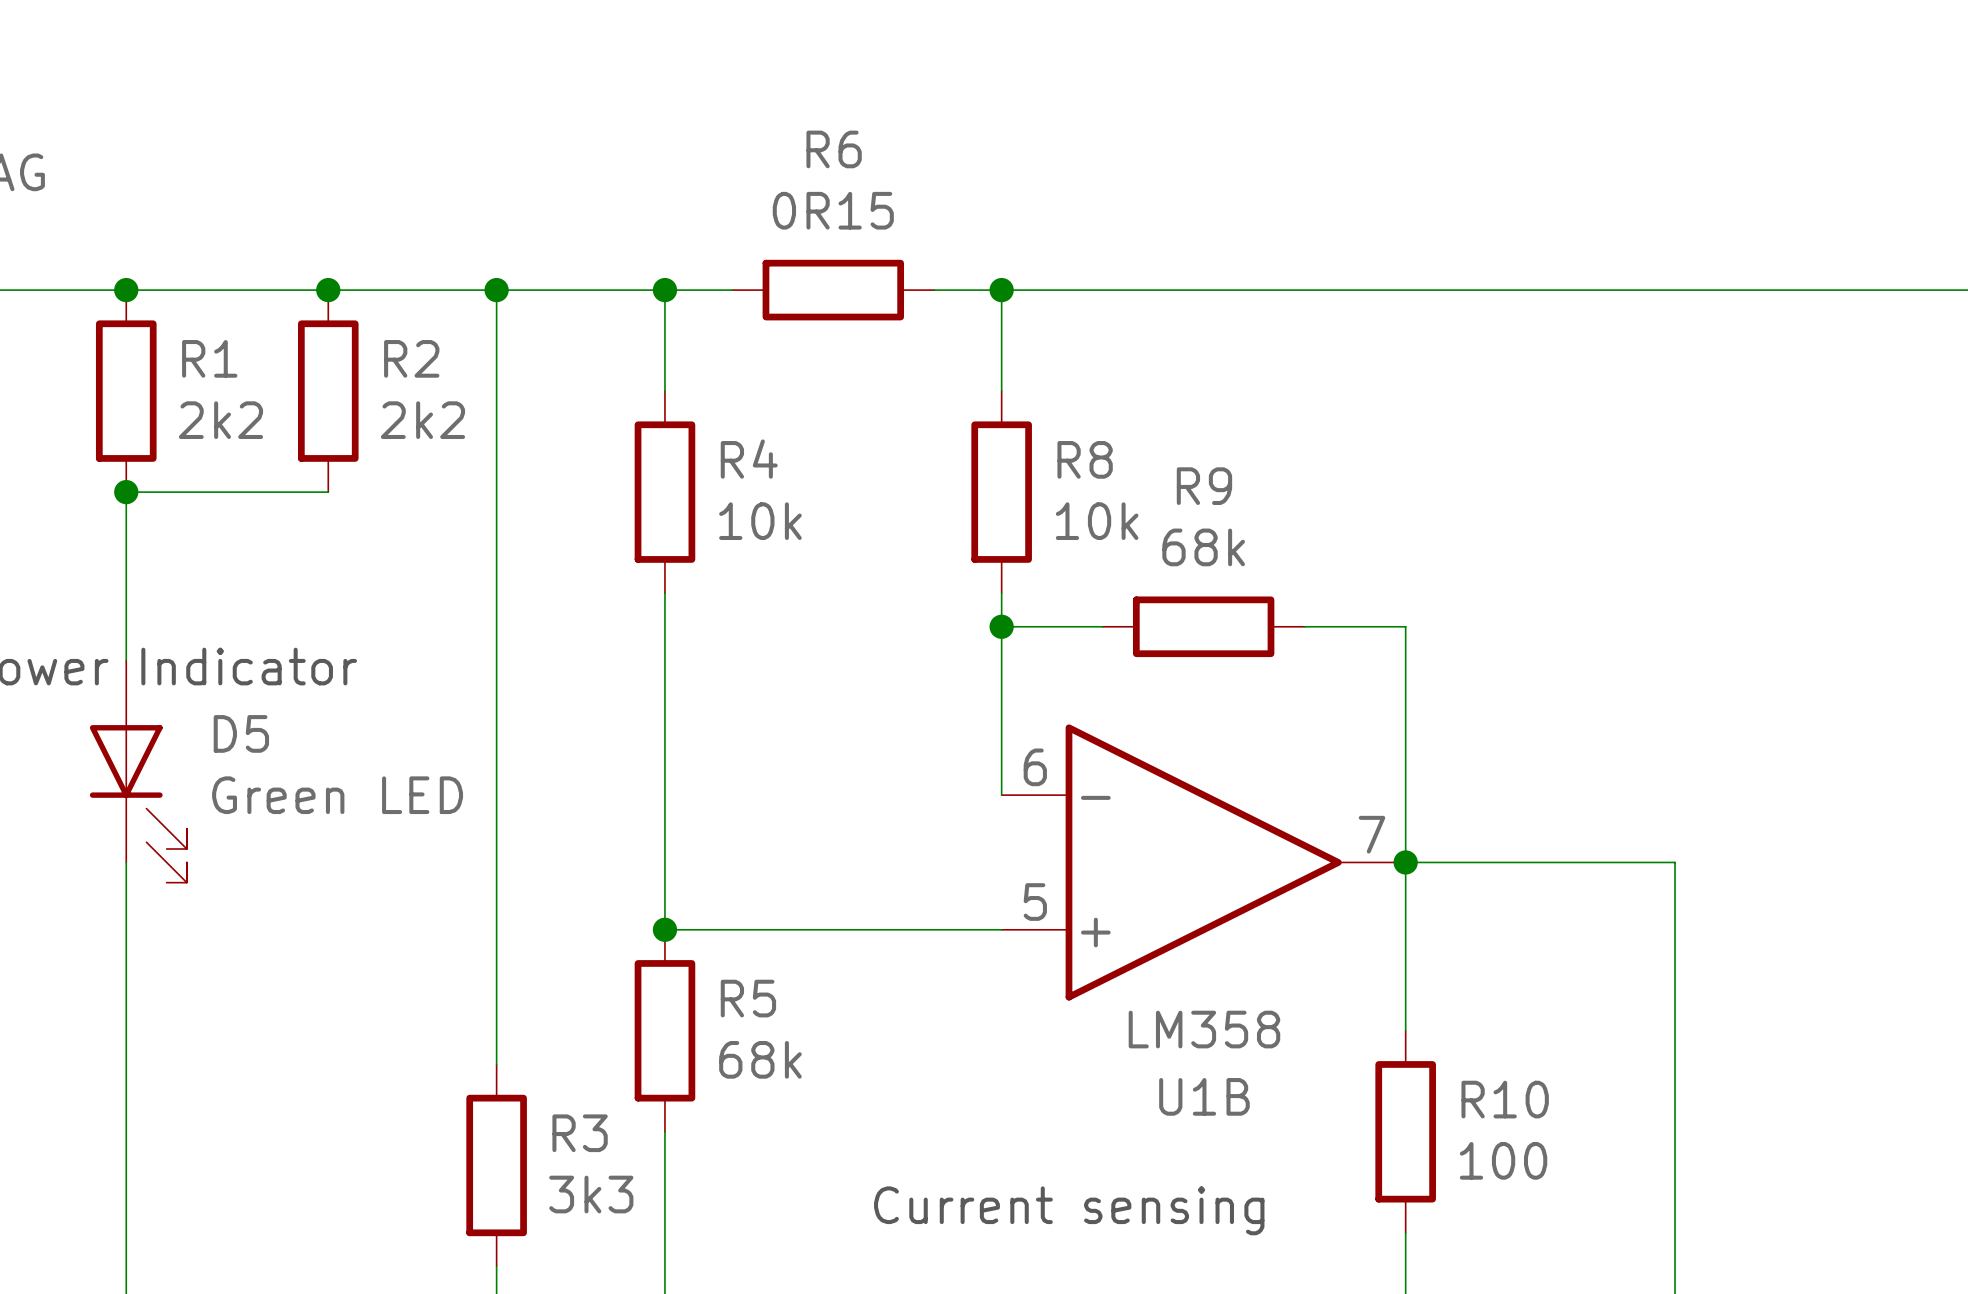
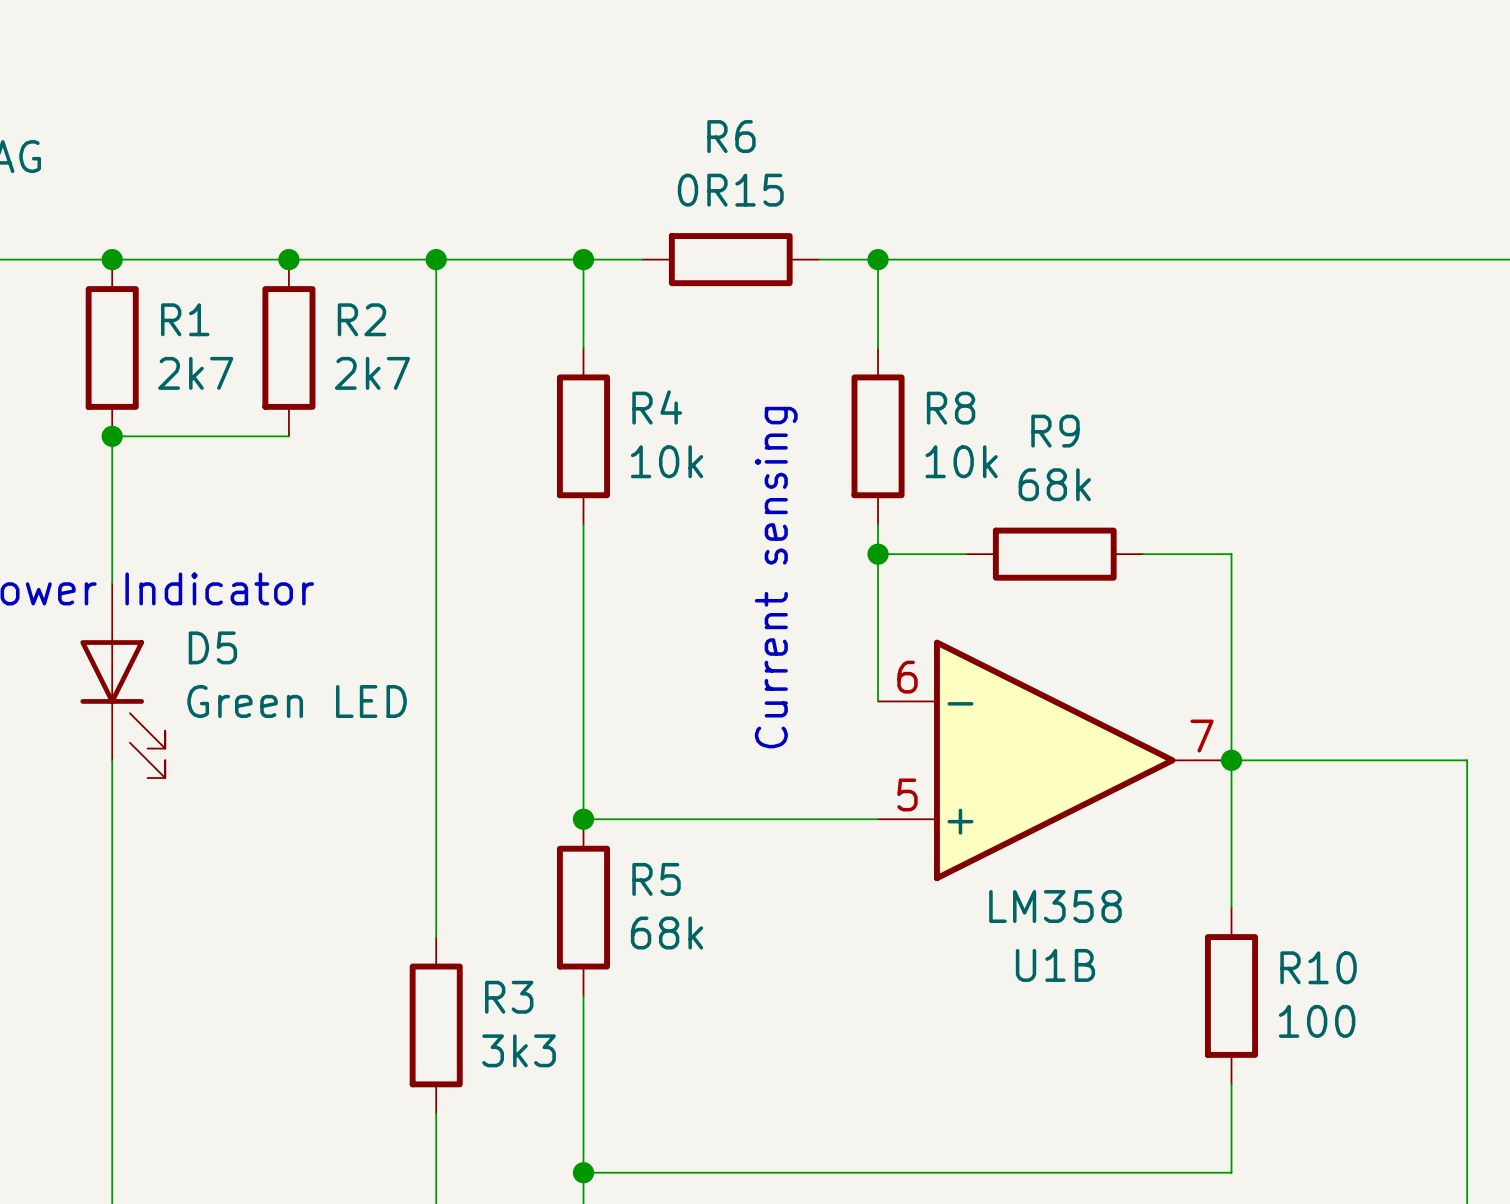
R1 value: 2k2 (220, 420) -> 2k7 (195, 373)
R2 value: 2k2 (422, 420) -> 2k7 (372, 373)
text rotation: 0° (1069, 1210) -> 90° counterclockwise (776, 577)
text position: Current sensing (1069, 1210) -> Current sensing (776, 577)

